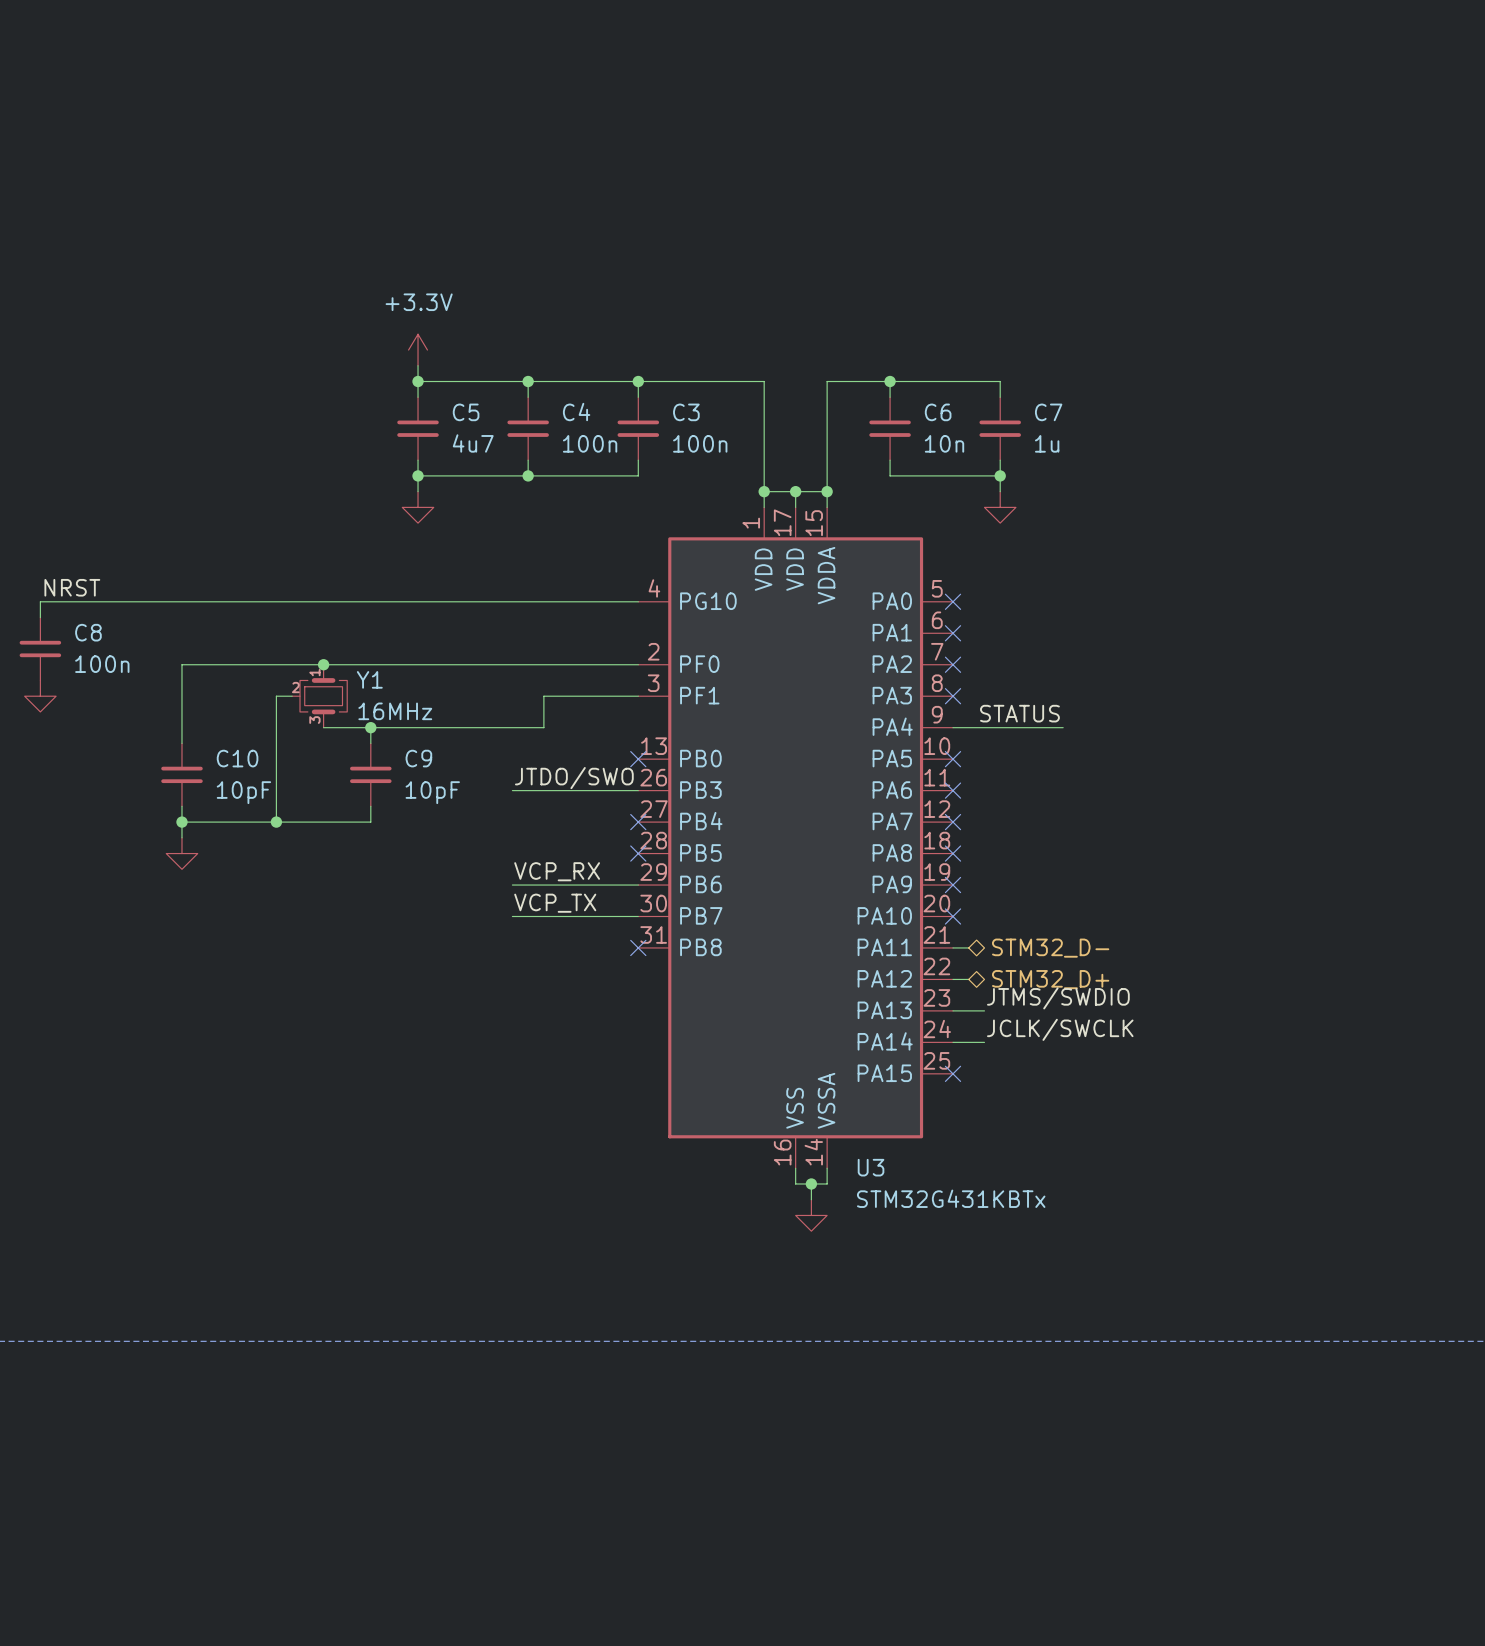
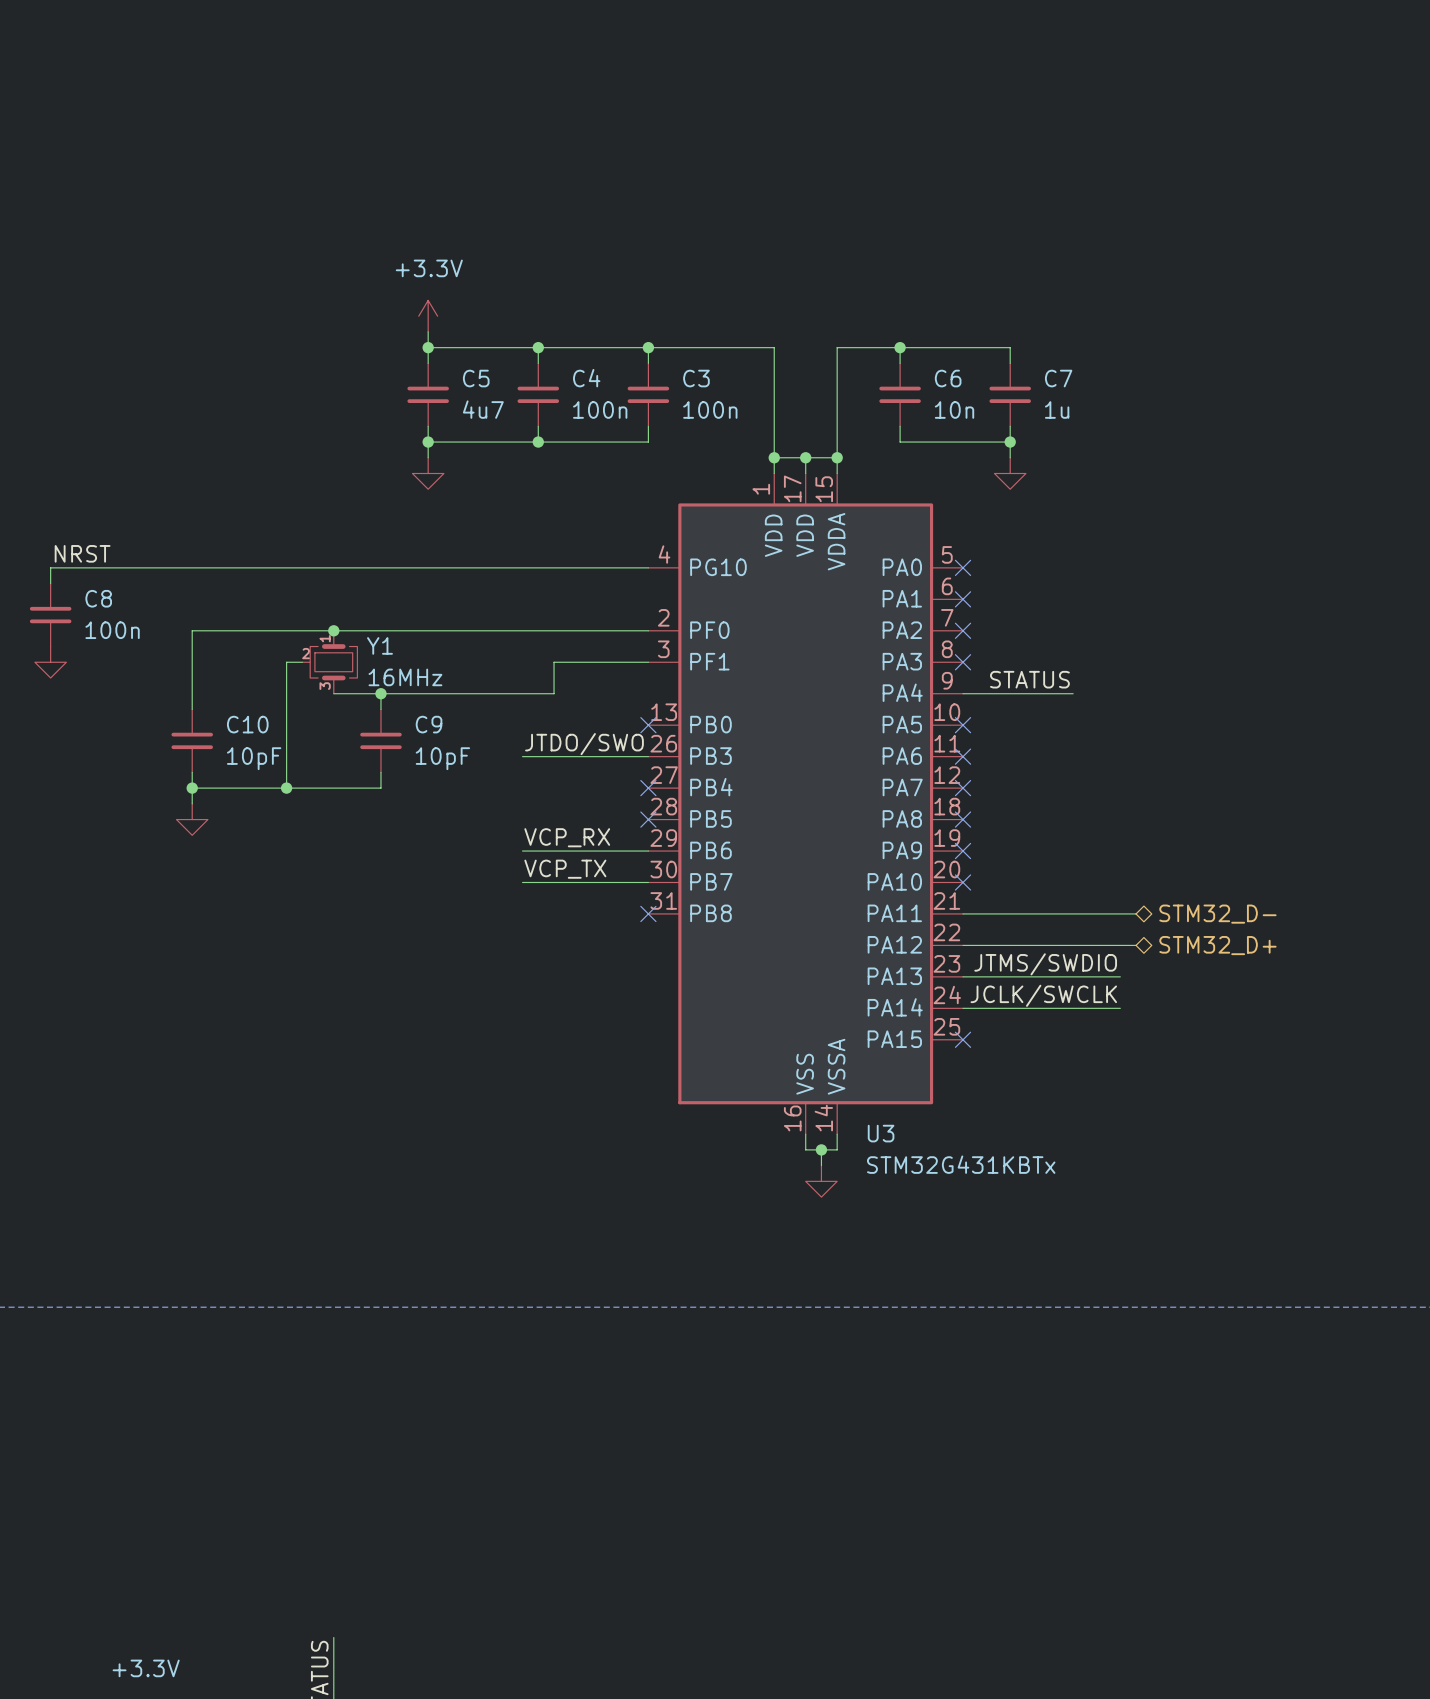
wire: none -> (978, 913) (1136, 913)
hierarchical label position: STM32_D- (1050, 948) -> STM32_D- (1217, 914)
wire: none -> (978, 945) (1136, 945)
hierarchical label position: STM32_D+ (1050, 979) -> STM32_D+ (1217, 945)
label position: JTMS/SWDIO (1058, 998) -> JTMS/SWDIO (1045, 964)
wire: none -> (994, 976) (1120, 976)
label position: JCLK/SWCLK (1060, 1029) -> JCLK/SWCLK (1043, 995)
wire: none -> (994, 1008) (1120, 1008)

